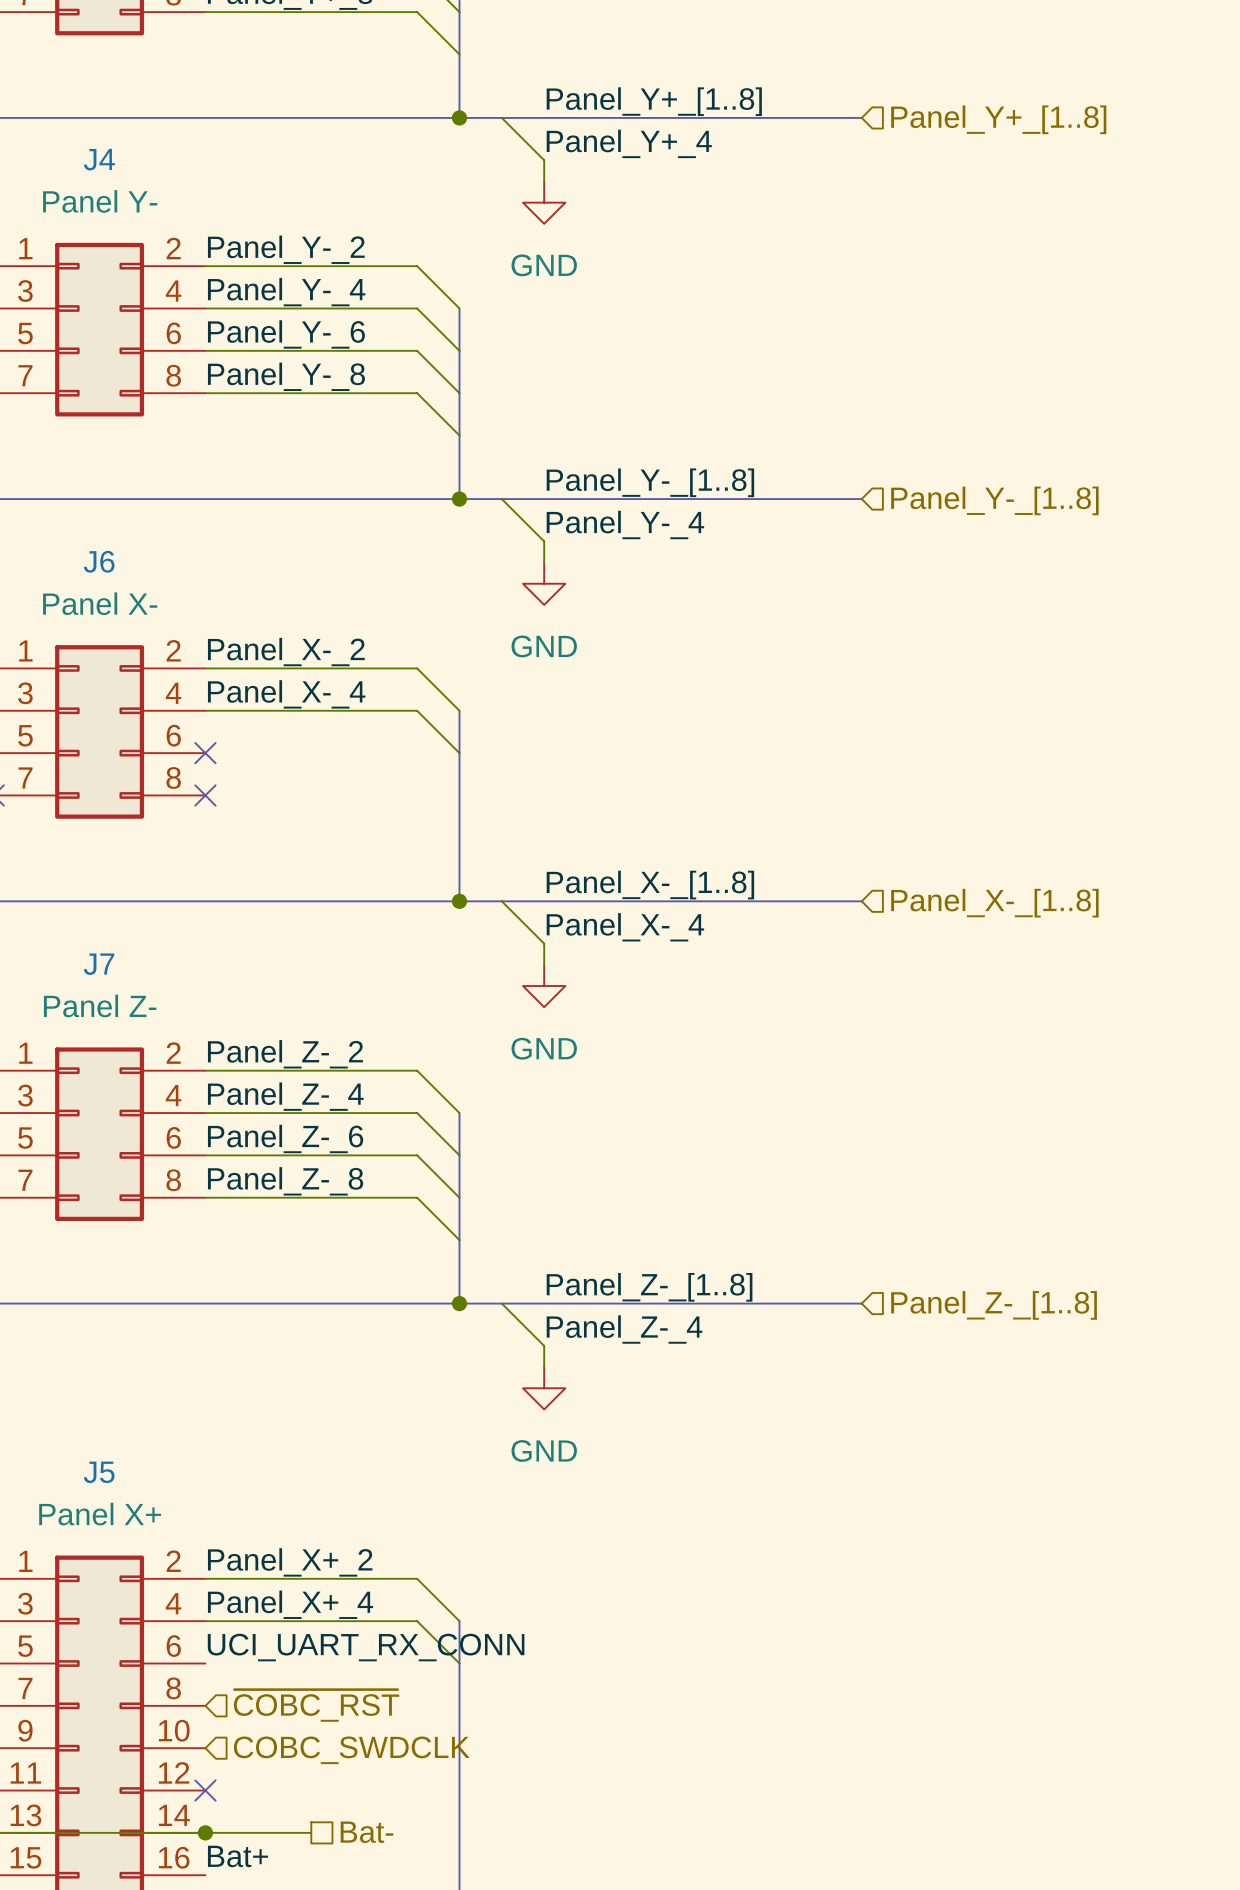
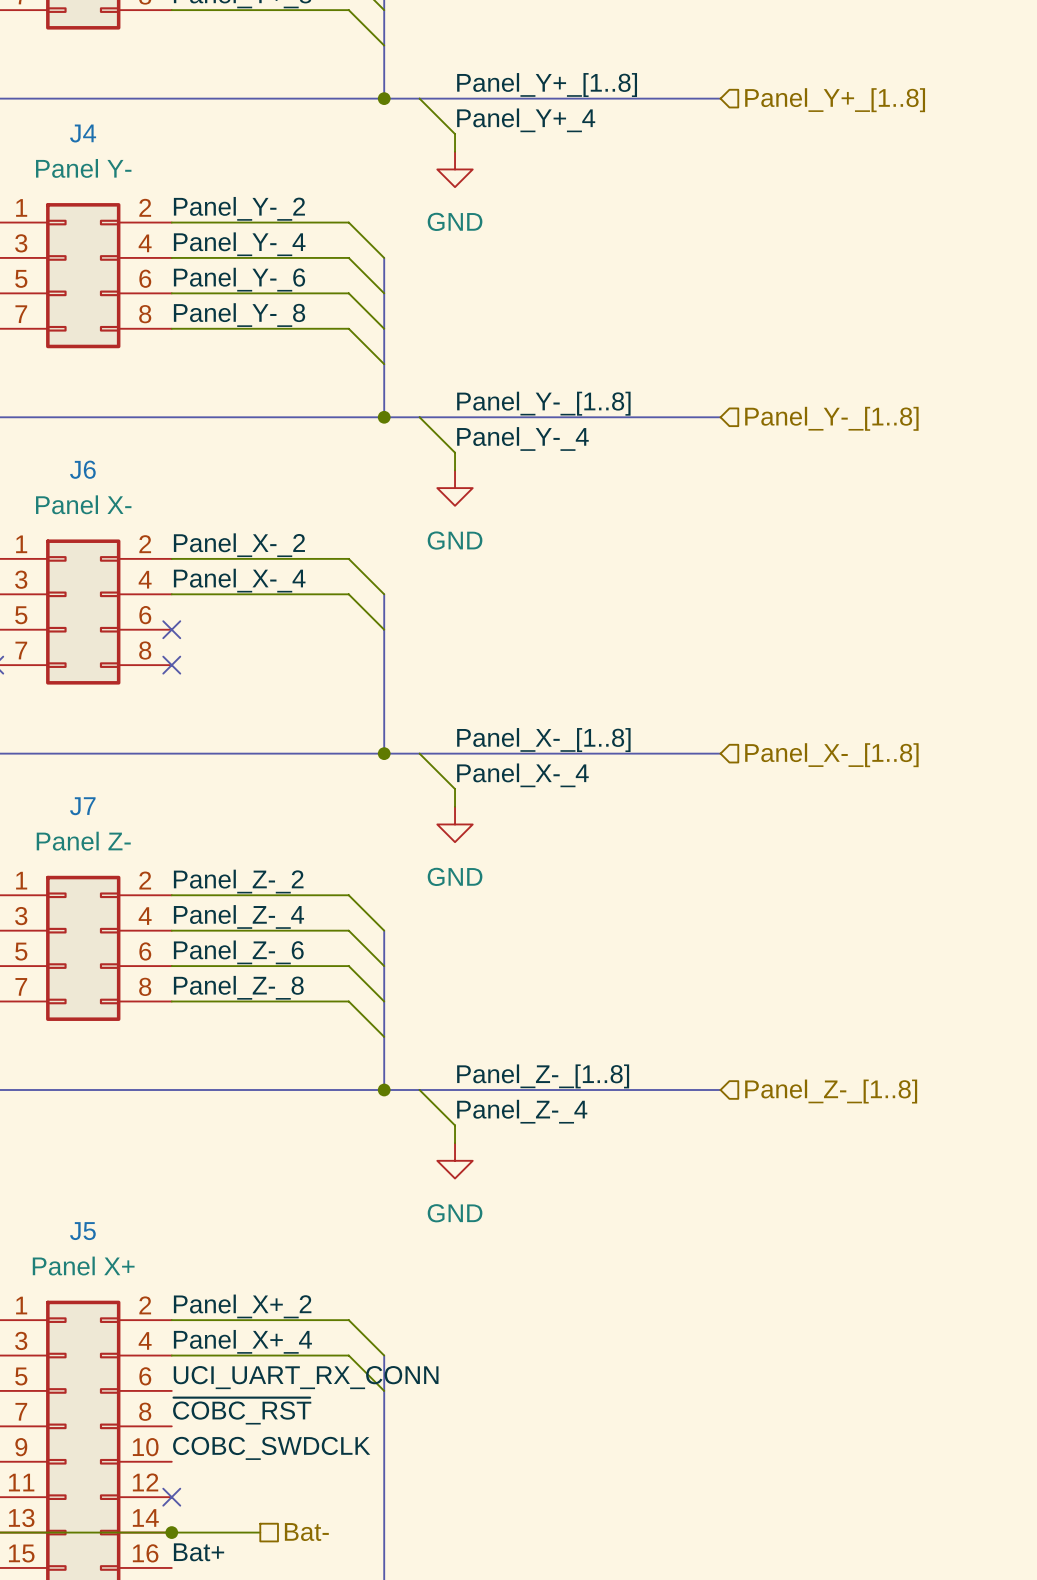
label: none -> ~{COBC_RST} (242, 1411)
hierarchical label: ~{COBC_RST} (316, 1705) -> none
label: none -> COBC_SWDCLK (271, 1448)
hierarchical label: COBC_SWDCLK (351, 1750) -> none

